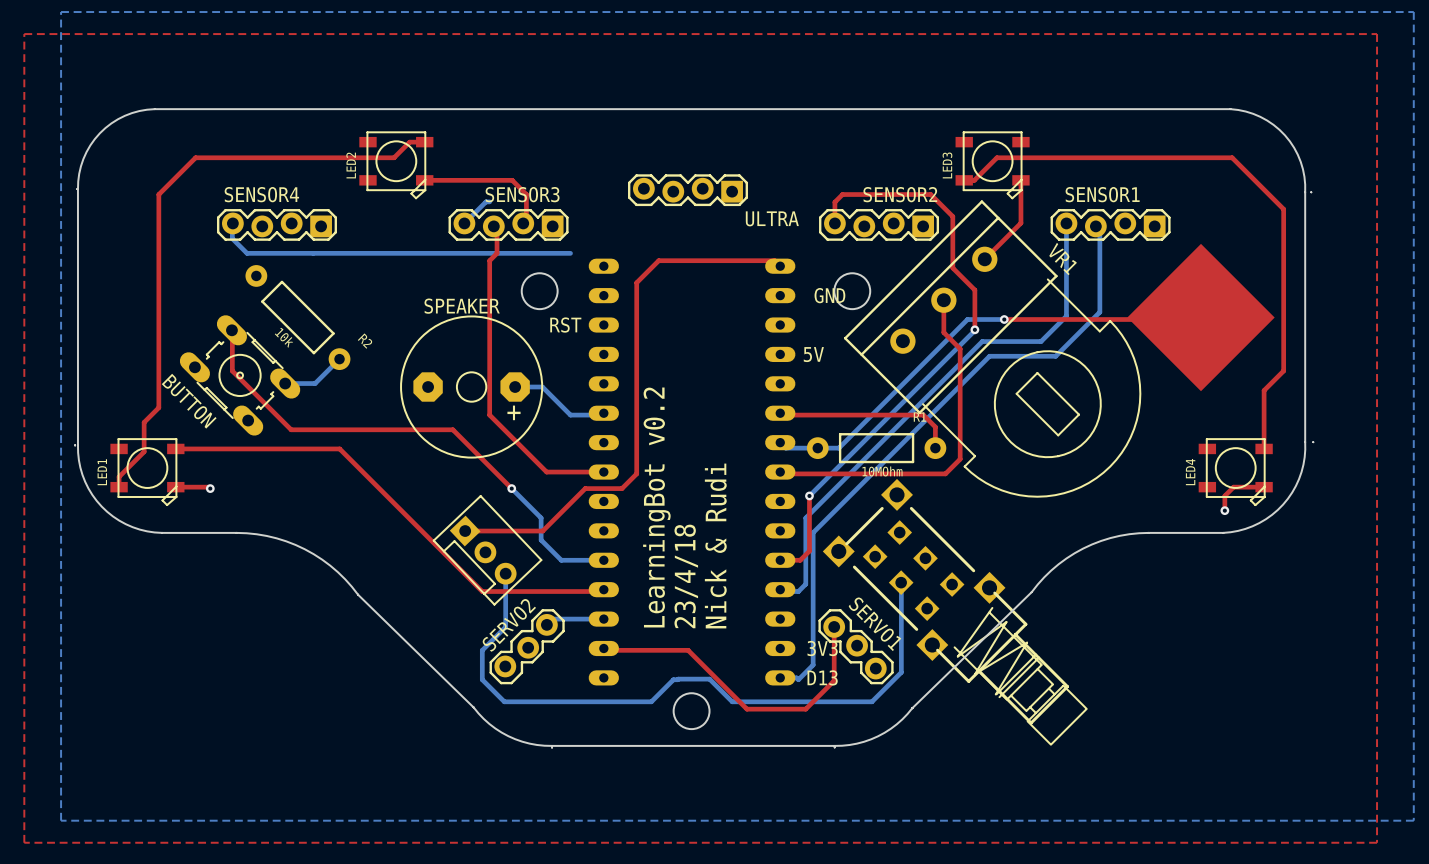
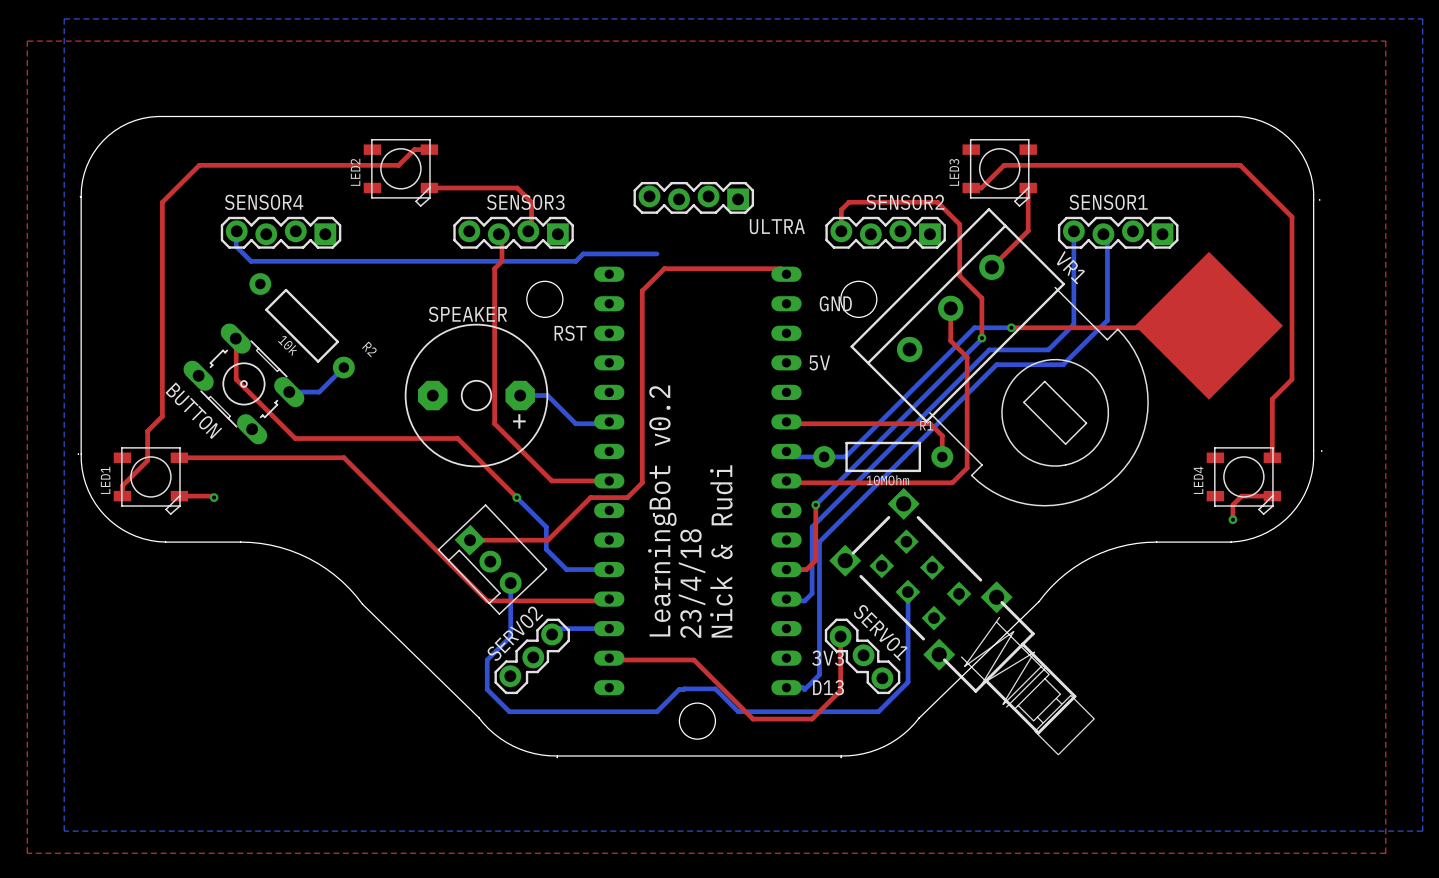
bottom track: (489, 201) (486, 201) (464, 223) -> none
bottom track: none -> (657, 253) (583, 253) (575, 261)

